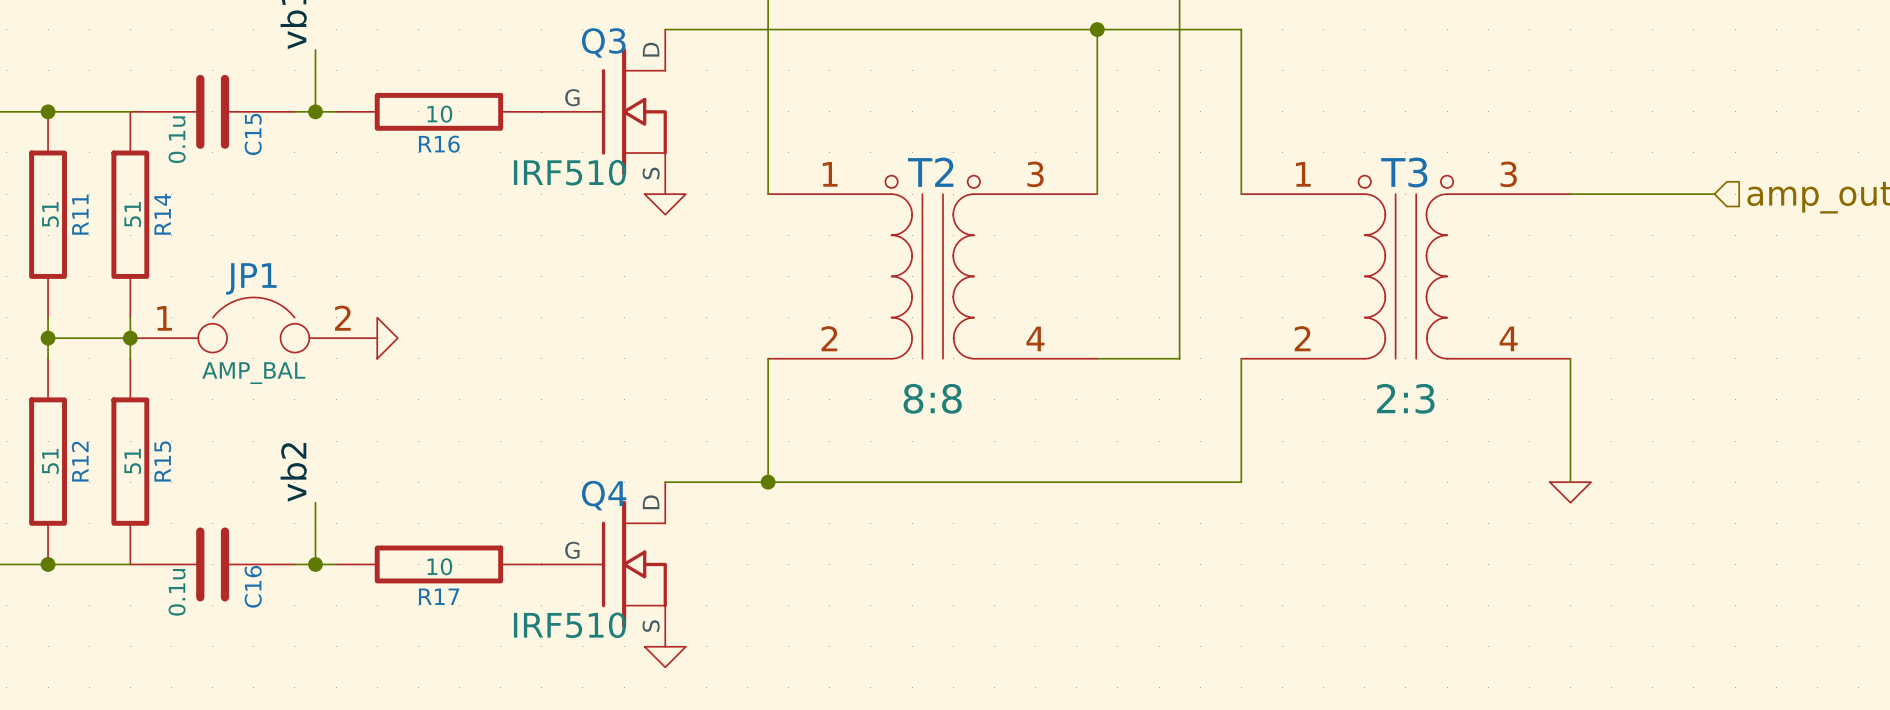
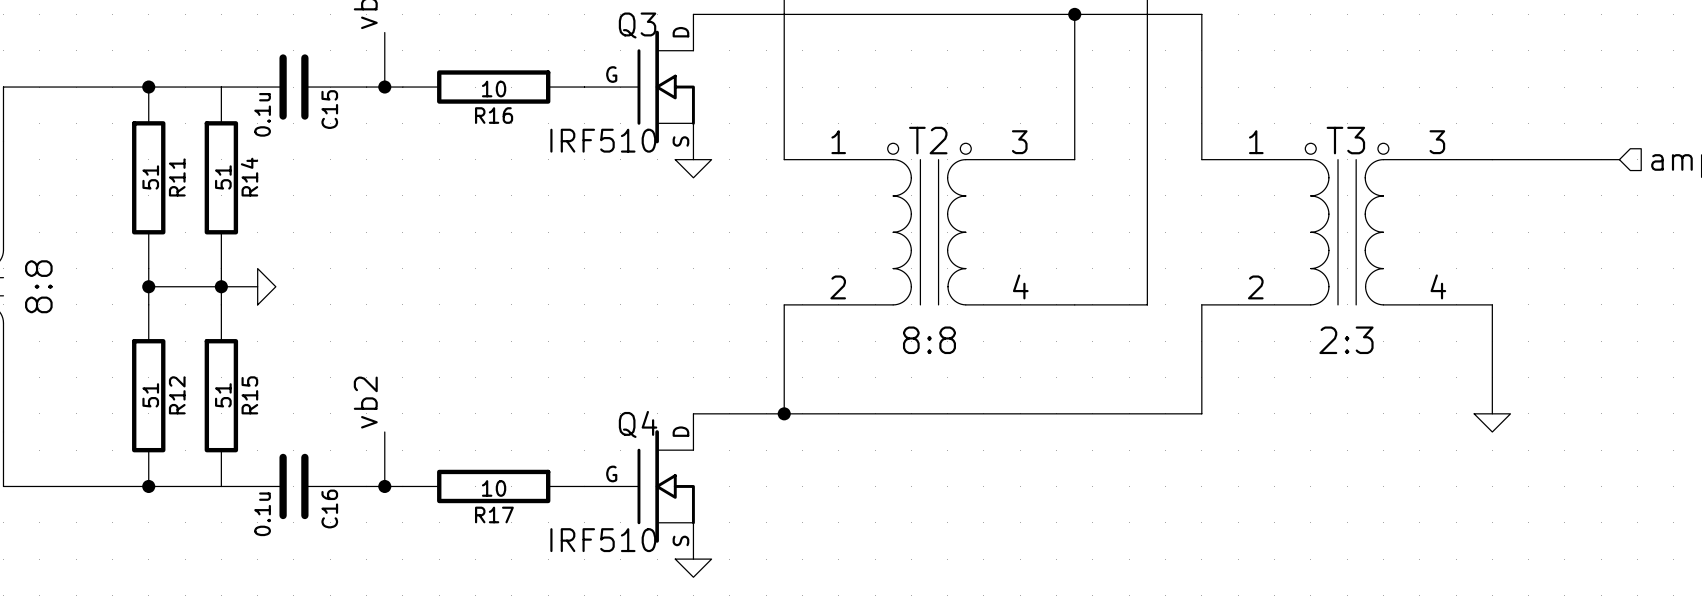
JP1: AMP_BAL (253, 324) -> none
power symbol position: (387, 338) -> (266, 286)

